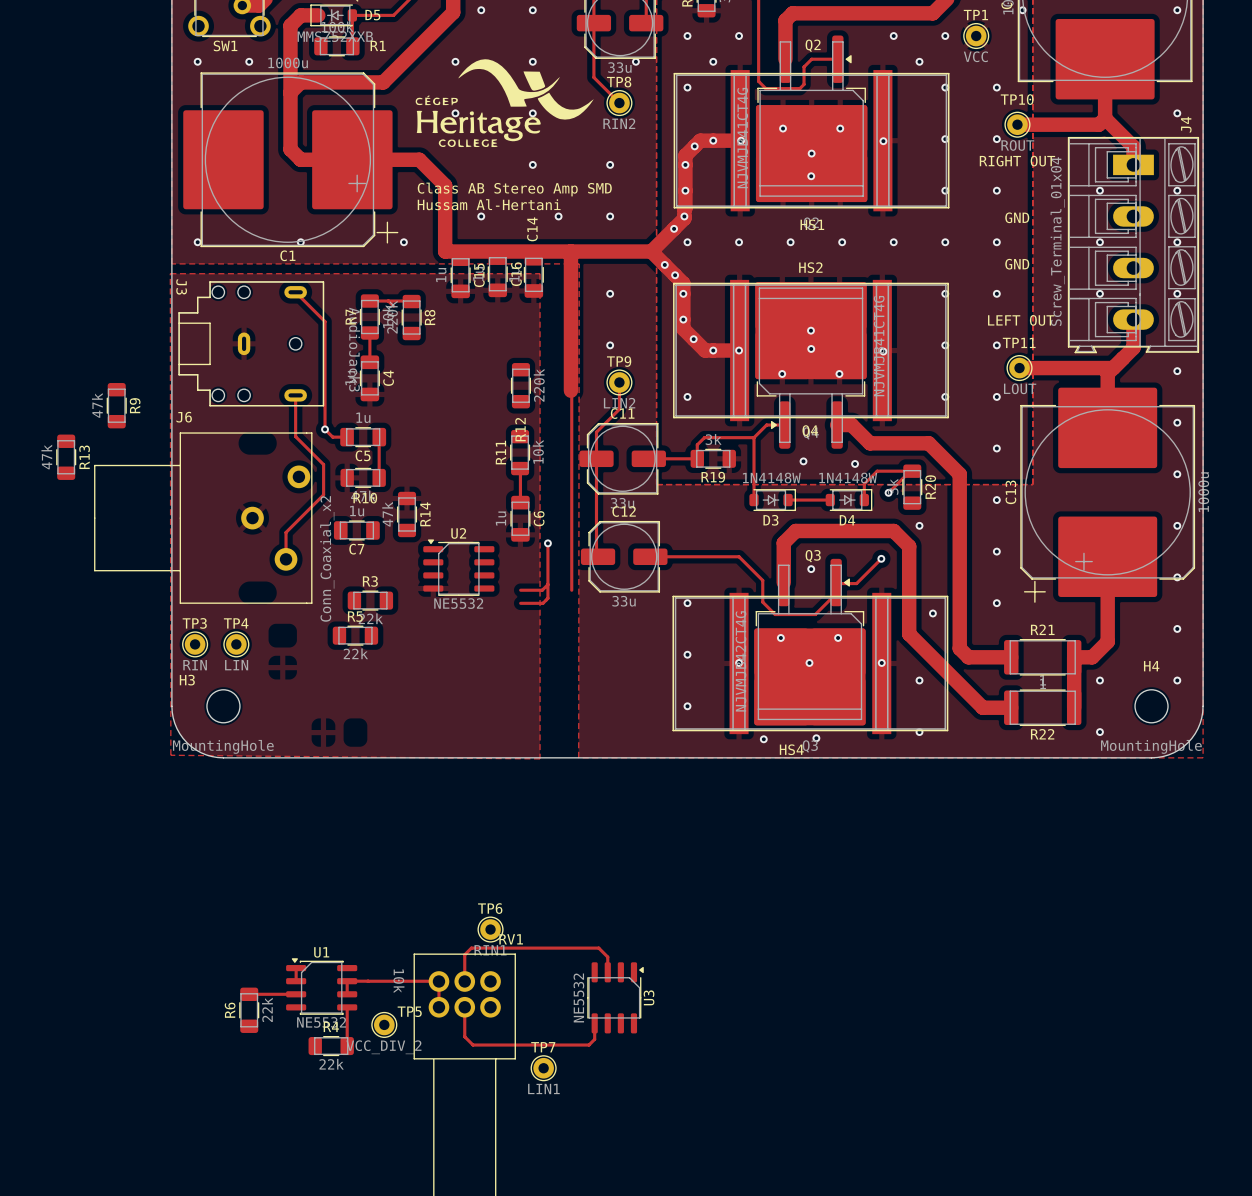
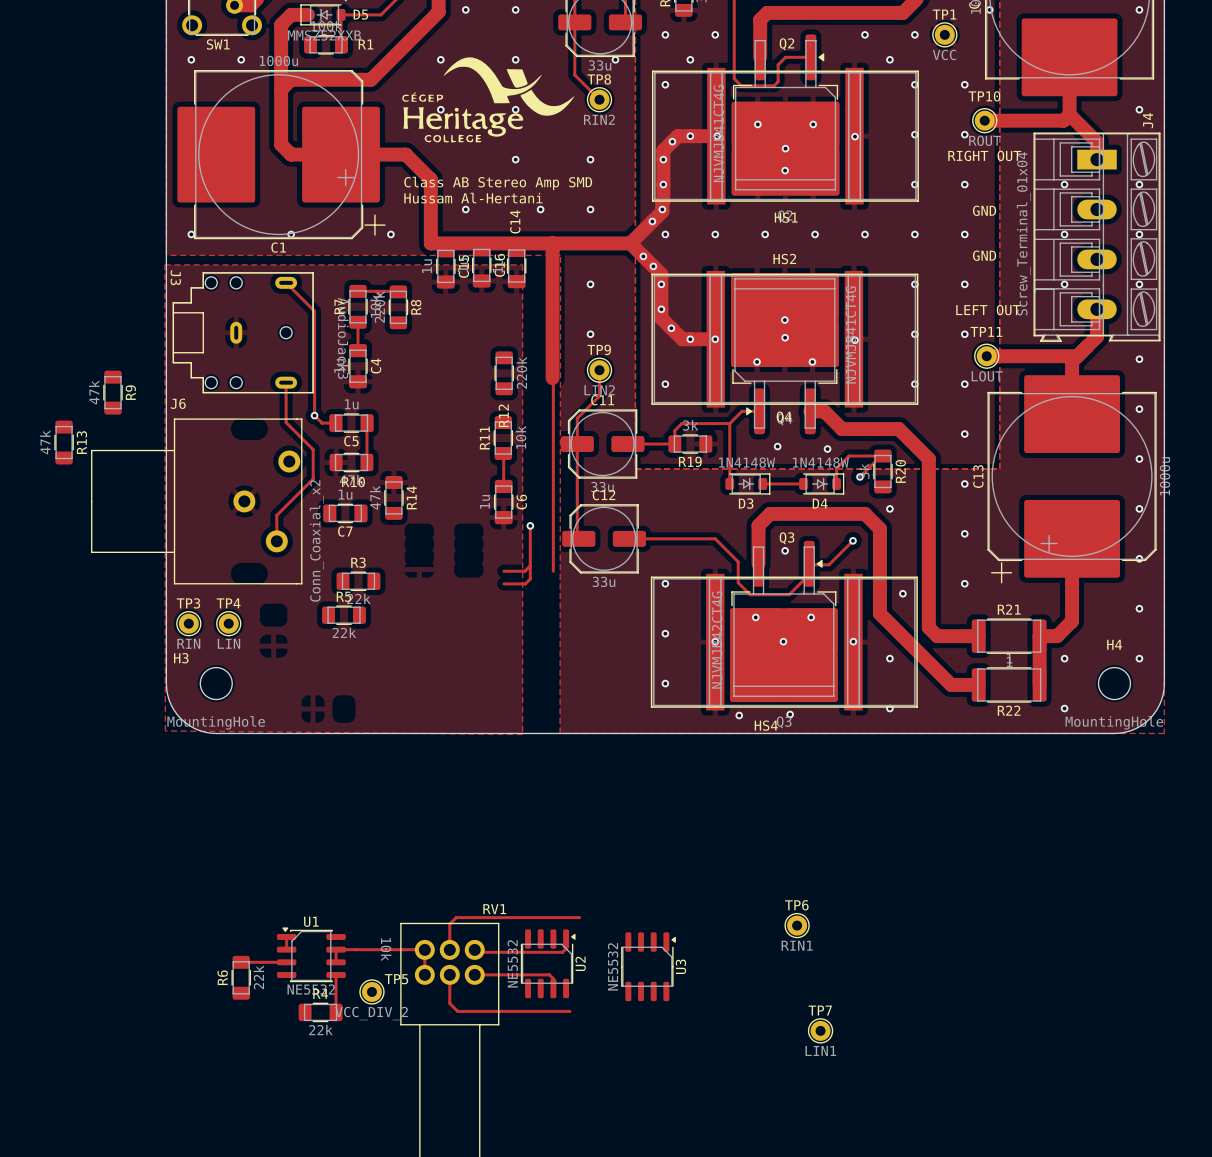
U2 rotation: 0° (458, 567) -> 90° clockwise (548, 963)
U2 position: (458, 567) -> (548, 963)
TP6 position: (490, 929) -> (797, 925)
track: (598, 948) (607, 957) (607, 972) -> none
track: none -> (566, 939) (566, 948) (562, 952) (477, 952) (474, 949)
U3 position: (615, 997) -> (648, 966)
track: none -> (474, 974) (549, 974) (553, 978) (553, 988)
track: (594, 1023) (594, 1039) (589, 1045) -> none
TP7 position: (543, 1068) -> (820, 1030)

